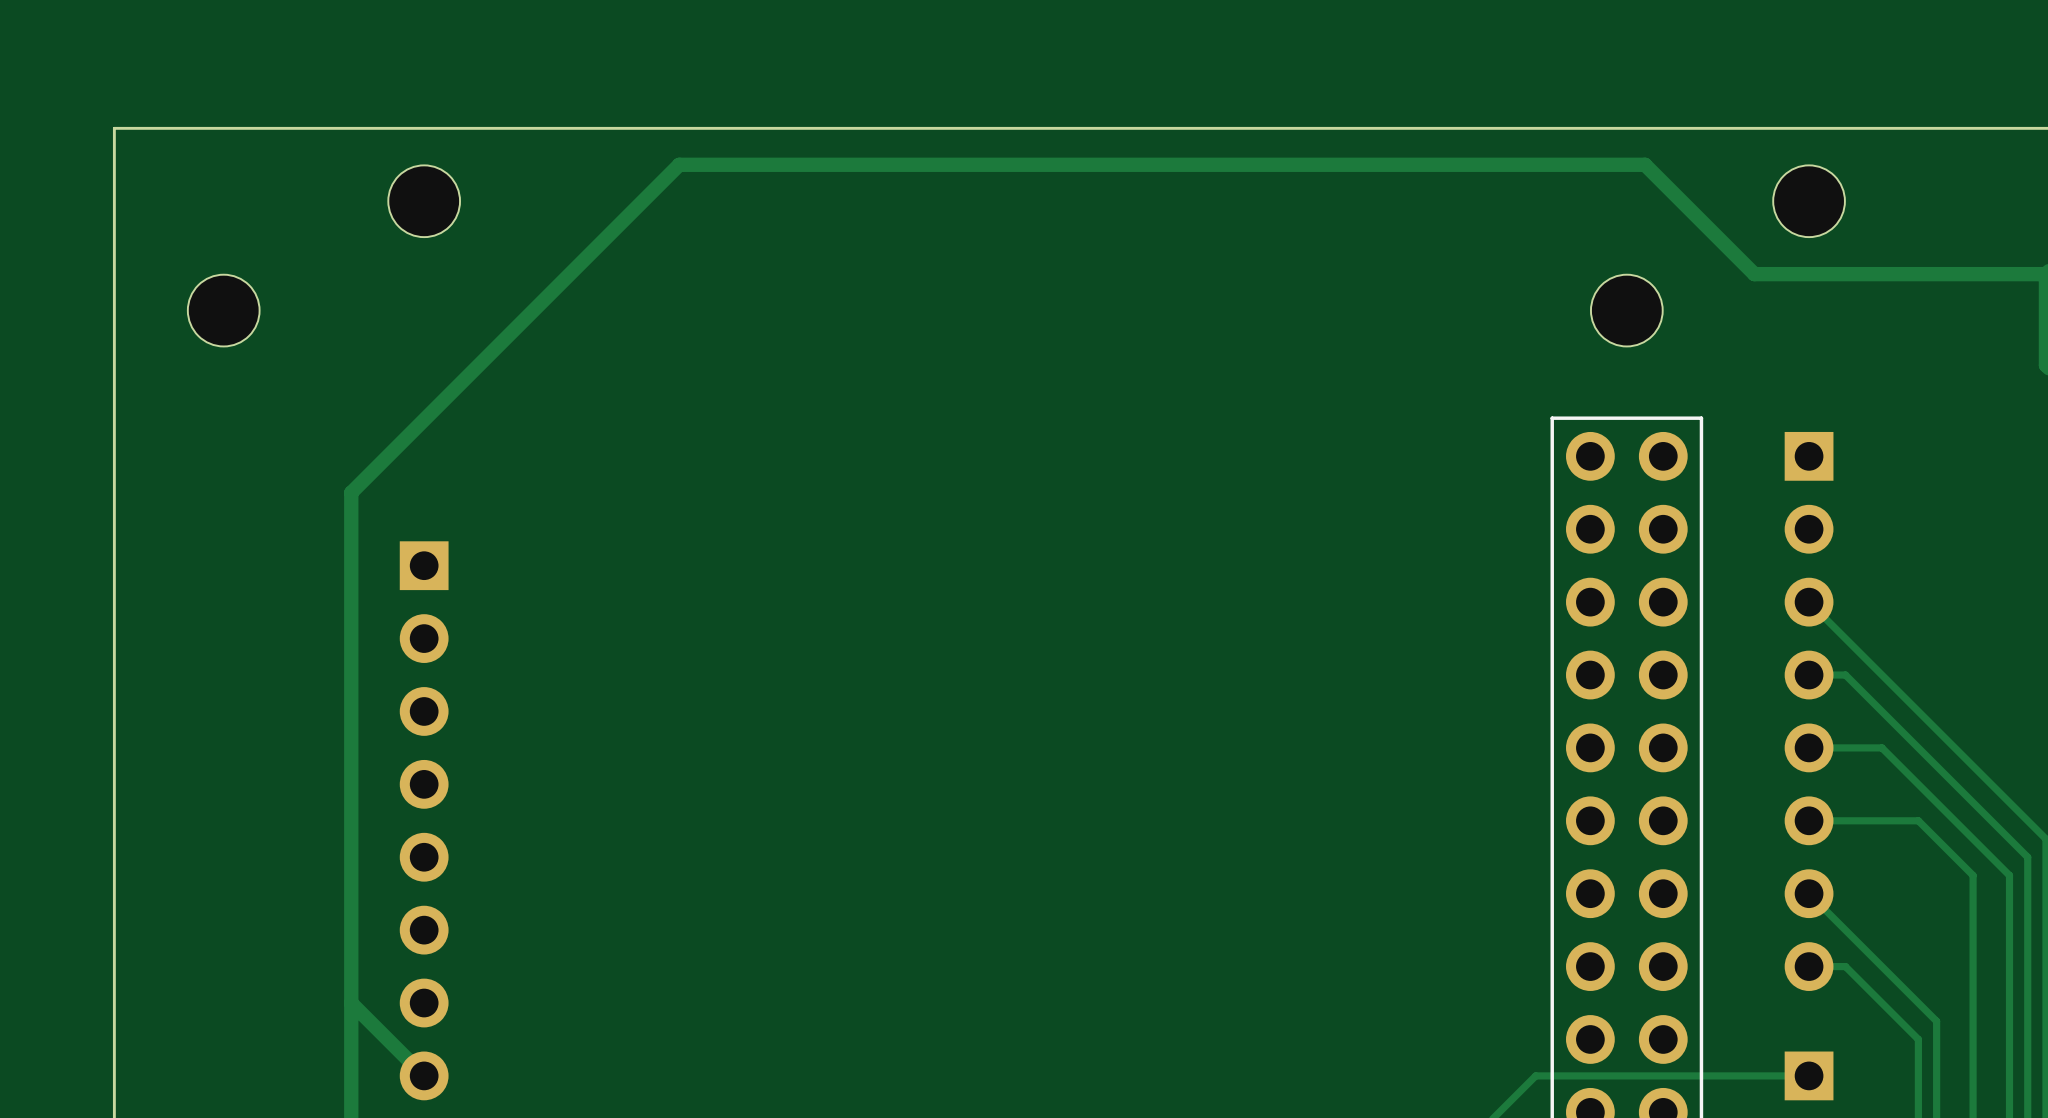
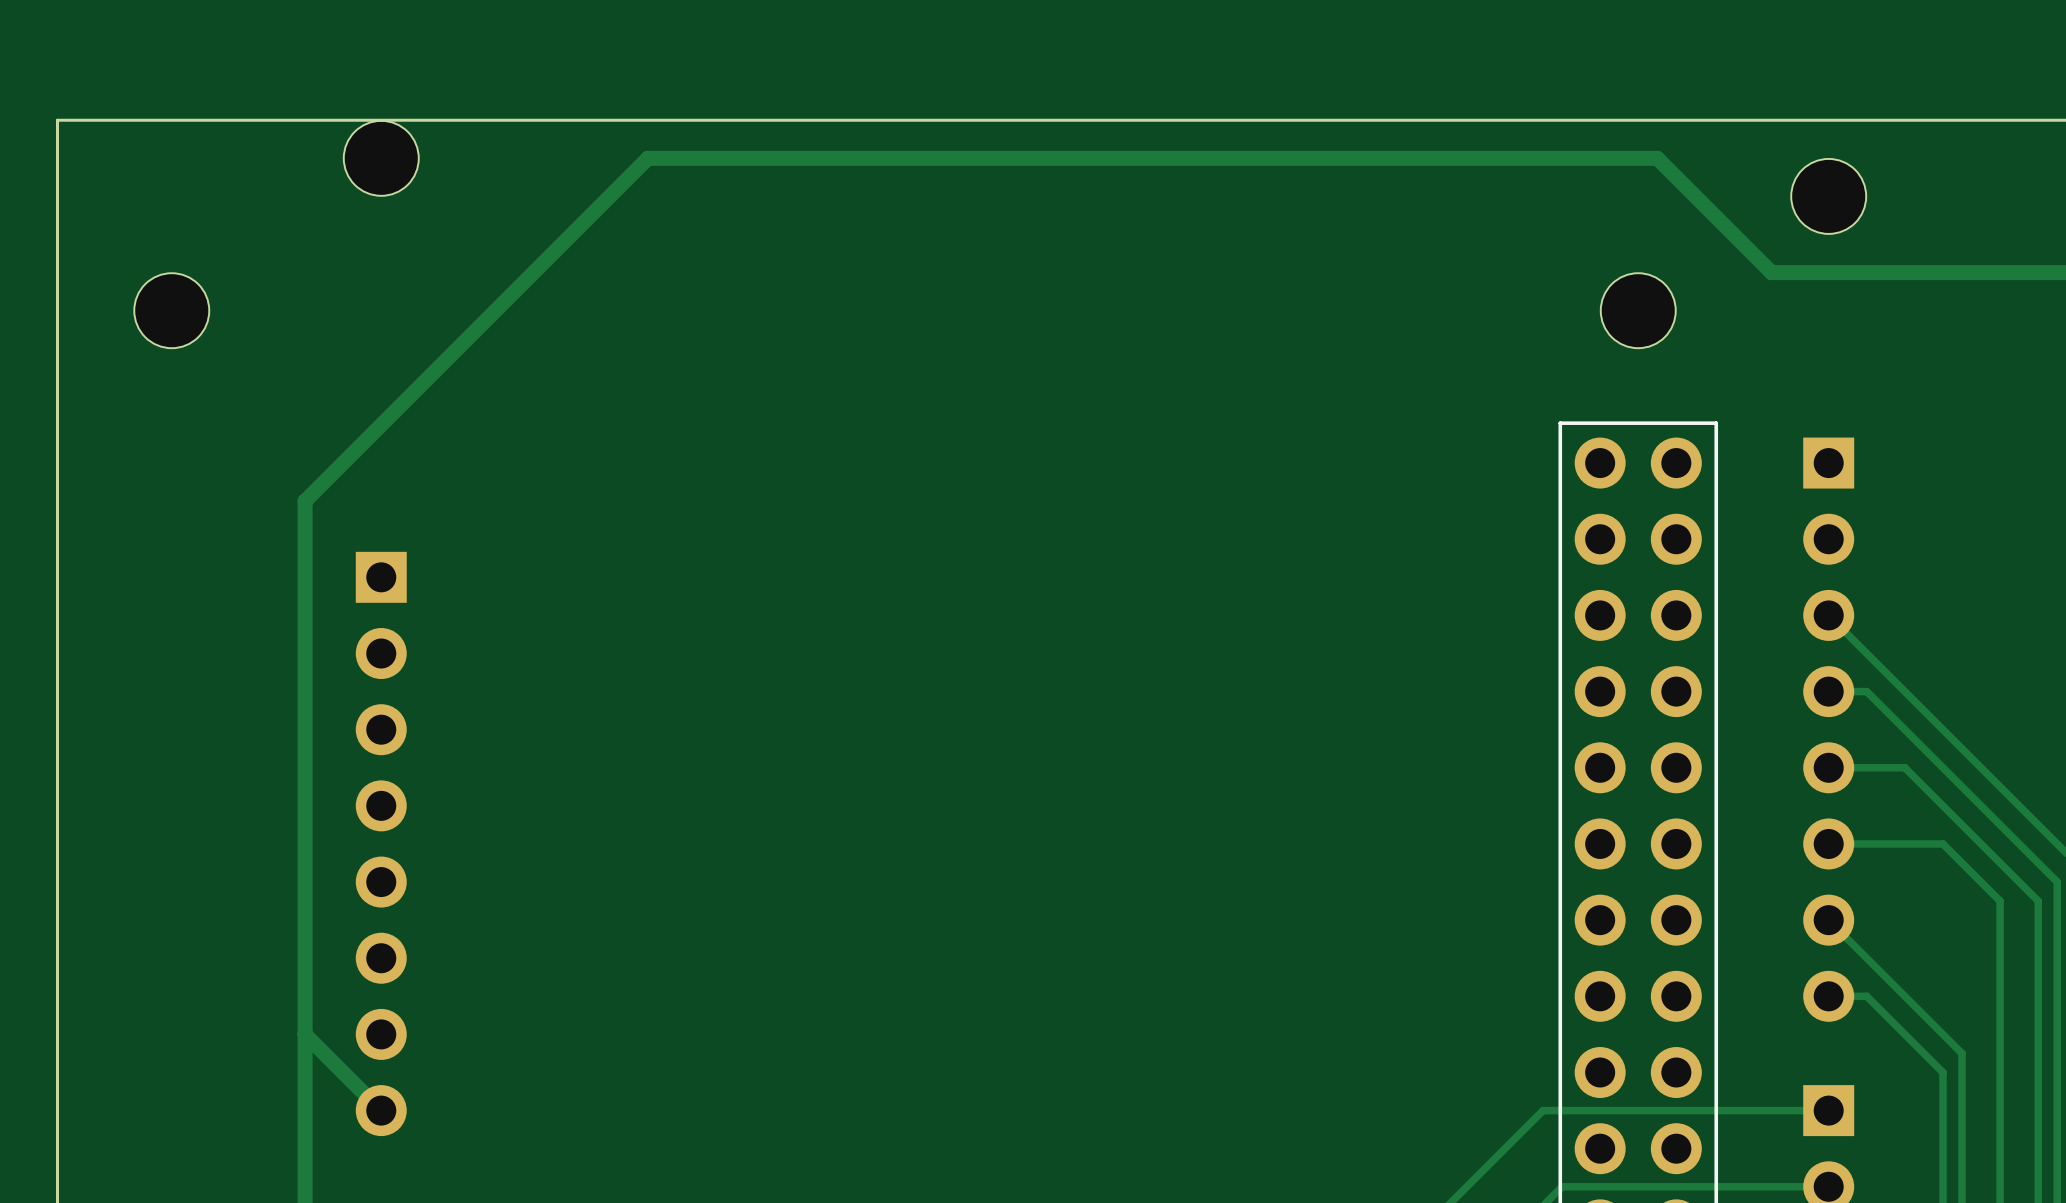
part position: (424, 201) -> (381, 158)

